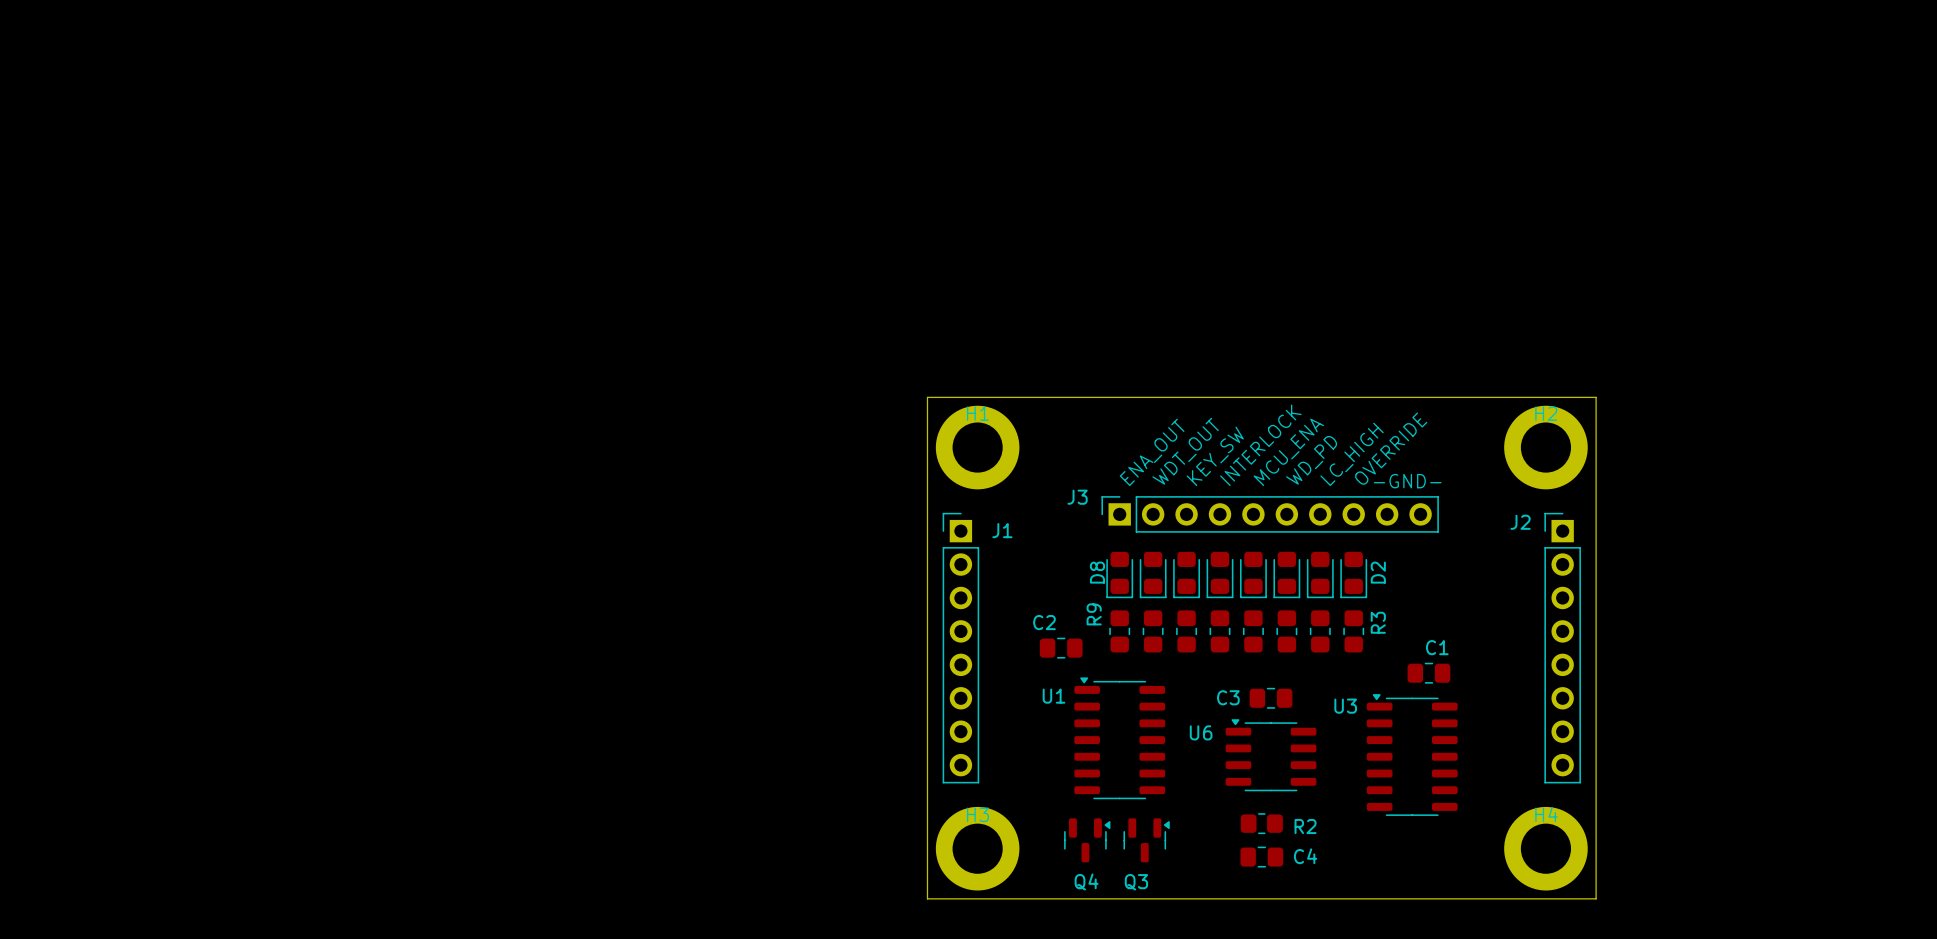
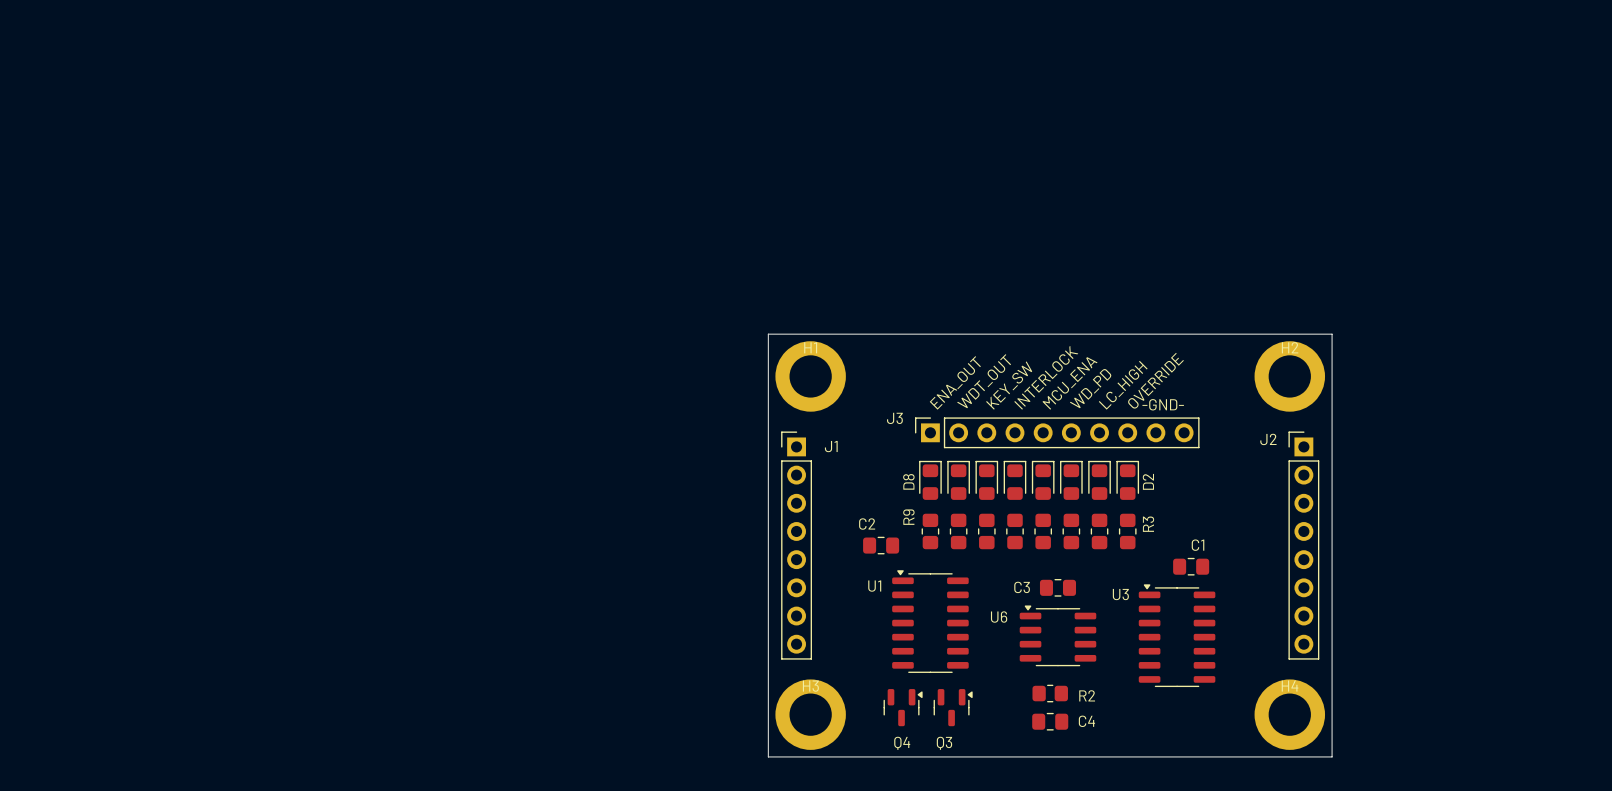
D8 rotation: 0° (1119, 575) -> 180° (930, 480)
part rotation: 0° (1153, 575) -> 180° (958, 480)
part rotation: 0° (1186, 575) -> 180° (986, 480)
part rotation: 0° (1220, 575) -> 180° (1014, 480)
part rotation: 0° (1253, 575) -> 180° (1043, 480)
part rotation: 0° (1286, 575) -> 180° (1071, 480)
part rotation: 0° (1320, 575) -> 180° (1099, 480)
D2 rotation: 0° (1353, 575) -> 180° (1127, 480)

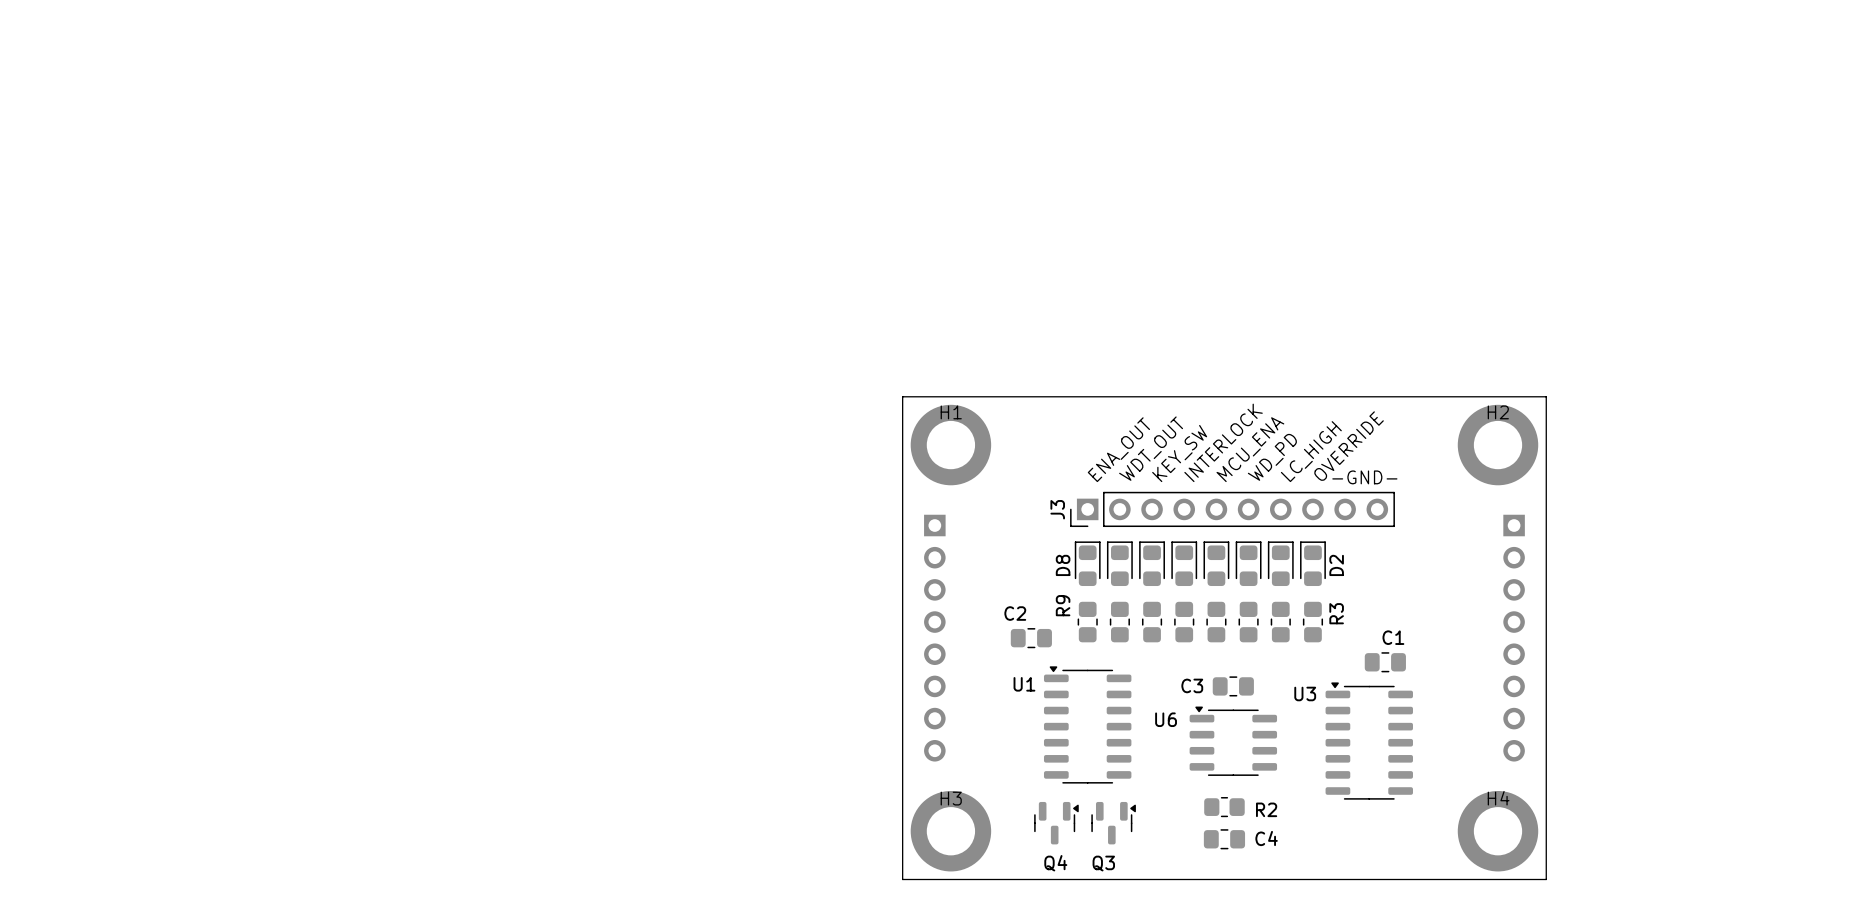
J3 footprint: [915, 417, 1200, 449] -> [1070, 491, 1395, 528]
J1 side: top (796, 545) -> bottom (934, 638)
J2 side: top (1303, 545) -> bottom (1514, 638)

